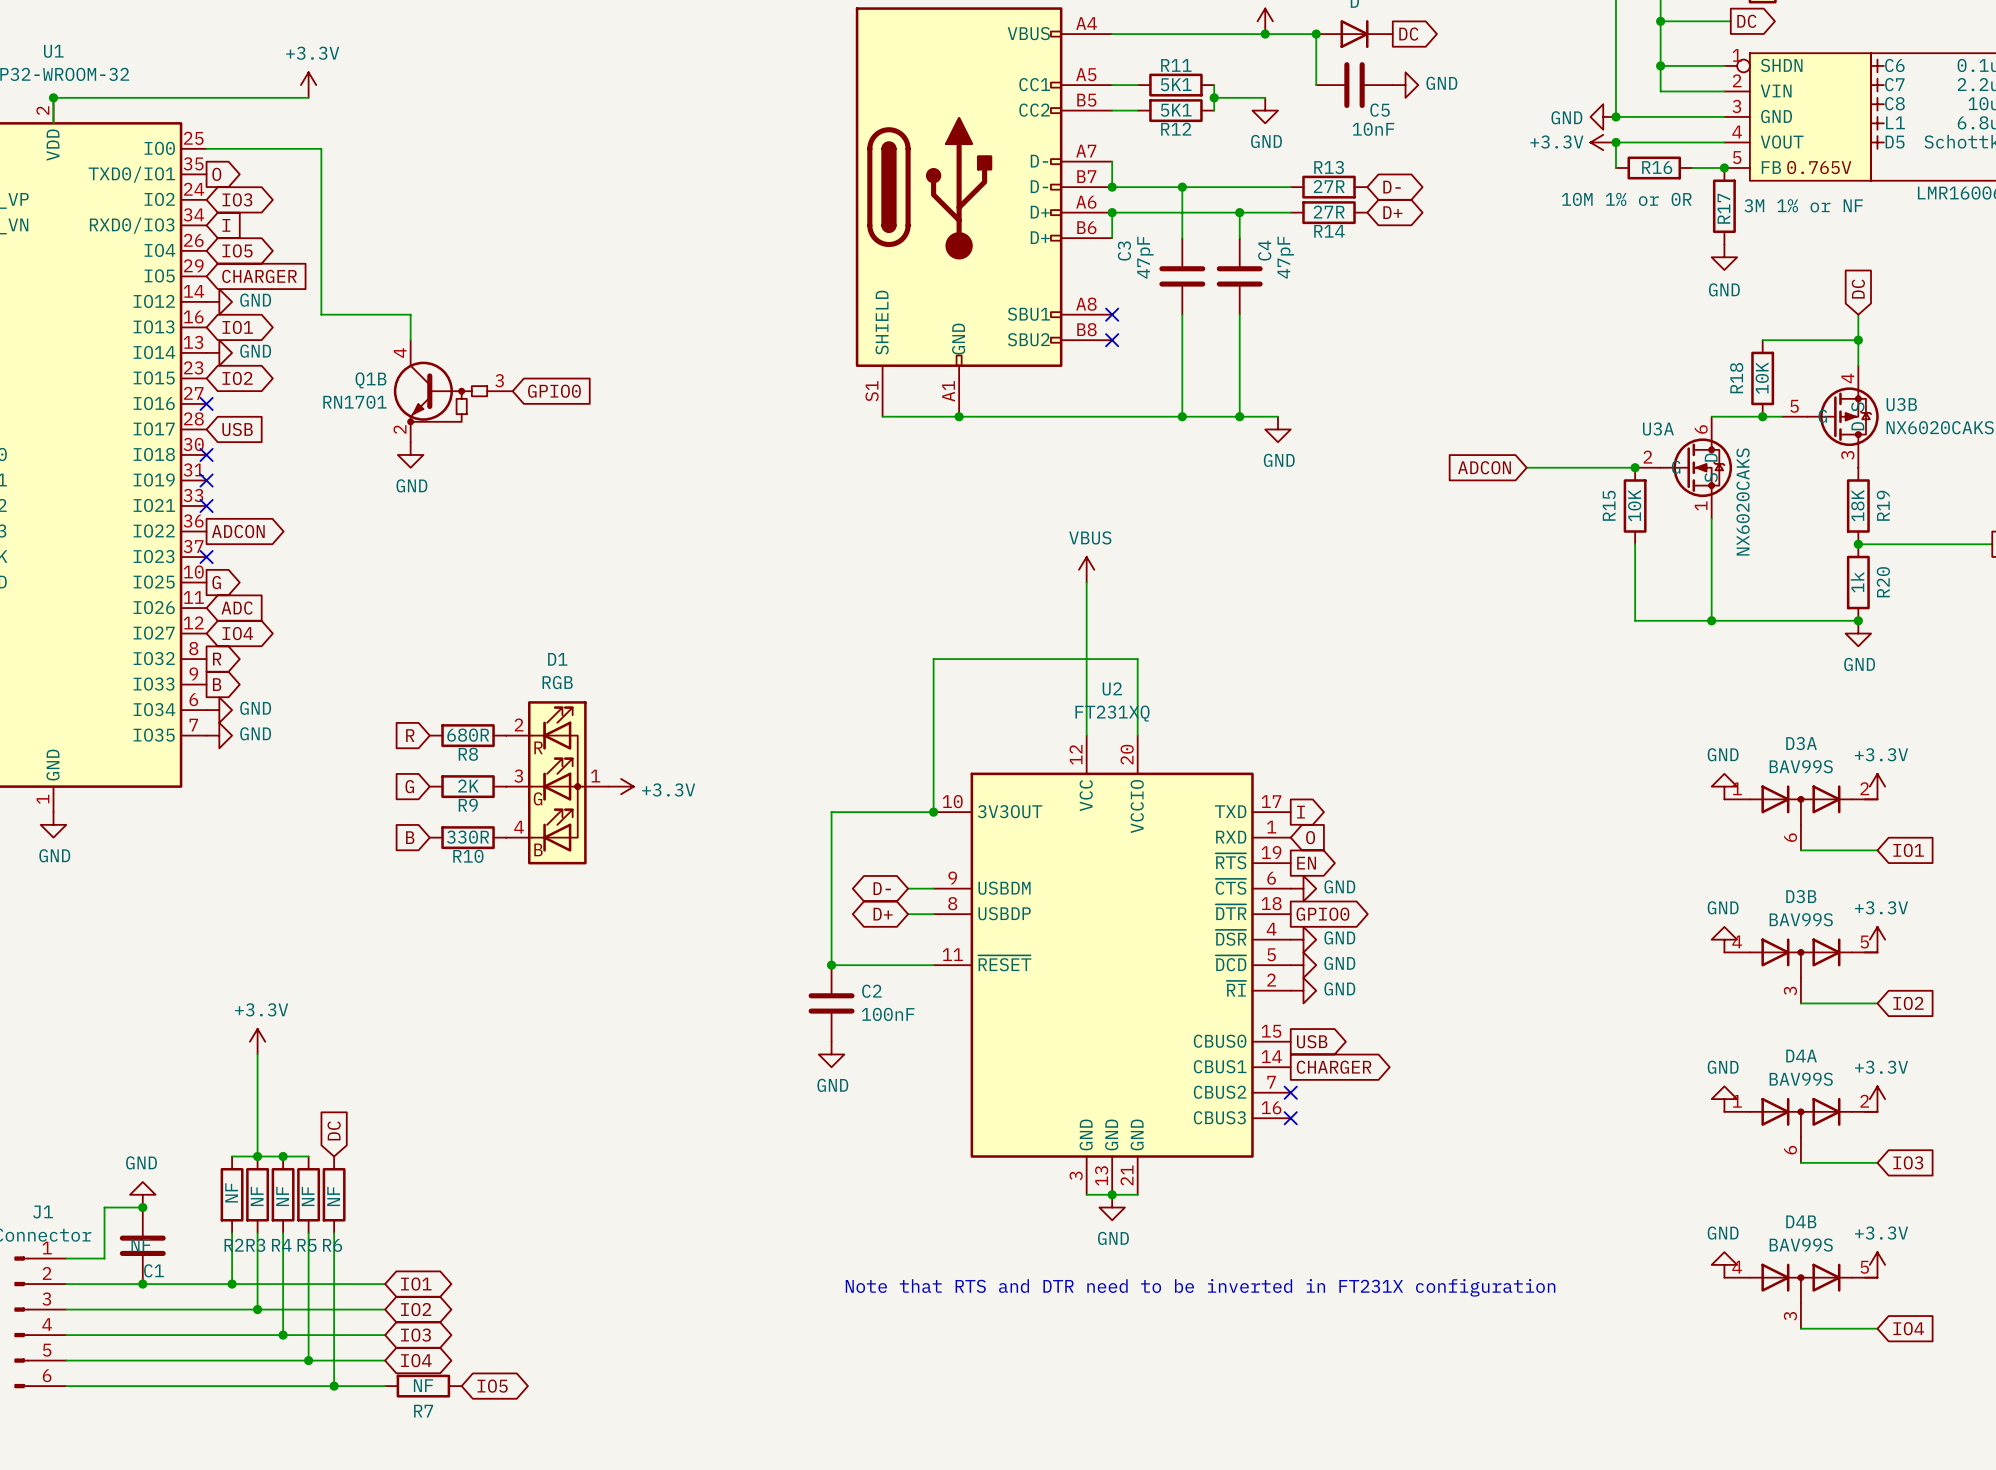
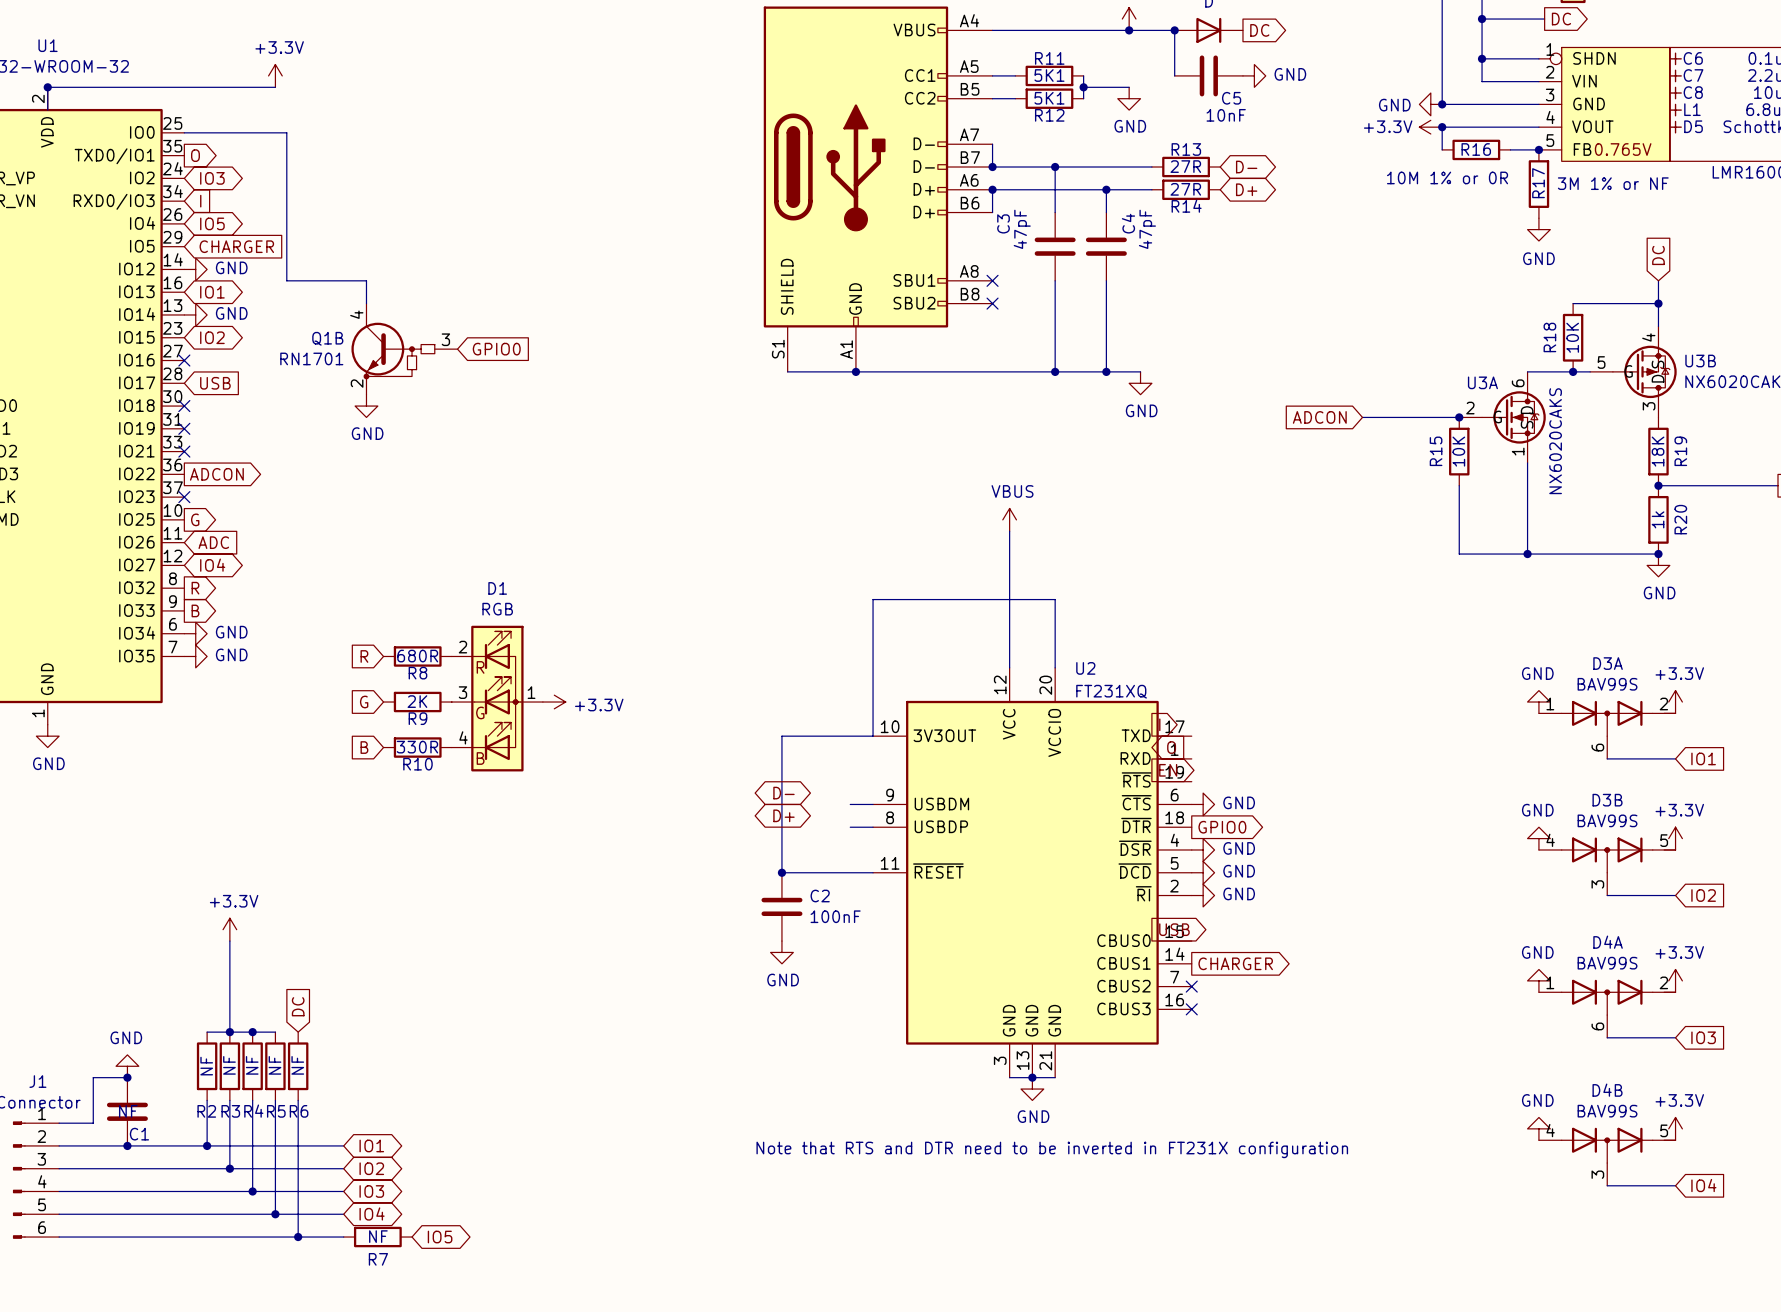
power symbol position: VBUS (1086, 569) -> VBUS (1009, 519)
wire: (1086, 582) (1086, 735) -> (1009, 531) (1009, 667)
U2 name position: U2 (1112, 688) -> U2 (1085, 668)
U2 value position: FT231XQ (1112, 713) -> FT231XQ (1111, 691)
wire: (1137, 735) (1137, 659) (933, 659) (933, 812) (831, 812) (831, 965) (933, 965) -> (1055, 667) (1055, 599) (873, 599) (873, 736) (781, 736) (781, 872) (873, 872)
junction: (933, 812) -> none
wire: (908, 888) (933, 888) -> (850, 804) (873, 804)
power symbol: GND (1303, 888) -> none
power symbol: none -> GND (1203, 804)
wire: (908, 914) (933, 914) -> (850, 827) (873, 827)
global label position: GPIO0 (1322, 914) -> GPIO0 (1222, 827)
power symbol: GND (1303, 939) -> none
power symbol: none -> GND (1203, 849)
junction position: (831, 965) -> (781, 872)
U2 position: (1112, 965) -> (1032, 872)
power symbol: GND (1303, 965) -> none
power symbol: none -> GND (1203, 872)
power symbol: GND (1303, 990) -> none
C2 position: (831, 1003) -> (781, 906)
power symbol: none -> GND (1203, 895)
power symbol position: GND (831, 1054) -> GND (781, 952)
global label position: CHARGER (1334, 1067) -> CHARGER (1235, 963)
no-connect mark: (1290, 1092) -> none
no-connect mark: none -> (1191, 986)
no-connect mark: (1290, 1118) -> none
no-connect mark: none -> (1191, 1009)
wire: (1086, 1194) (1137, 1194) -> (1009, 1077) (1055, 1077)
junction position: (1112, 1194) -> (1032, 1077)
power symbol position: GND (1112, 1207) -> GND (1032, 1089)

